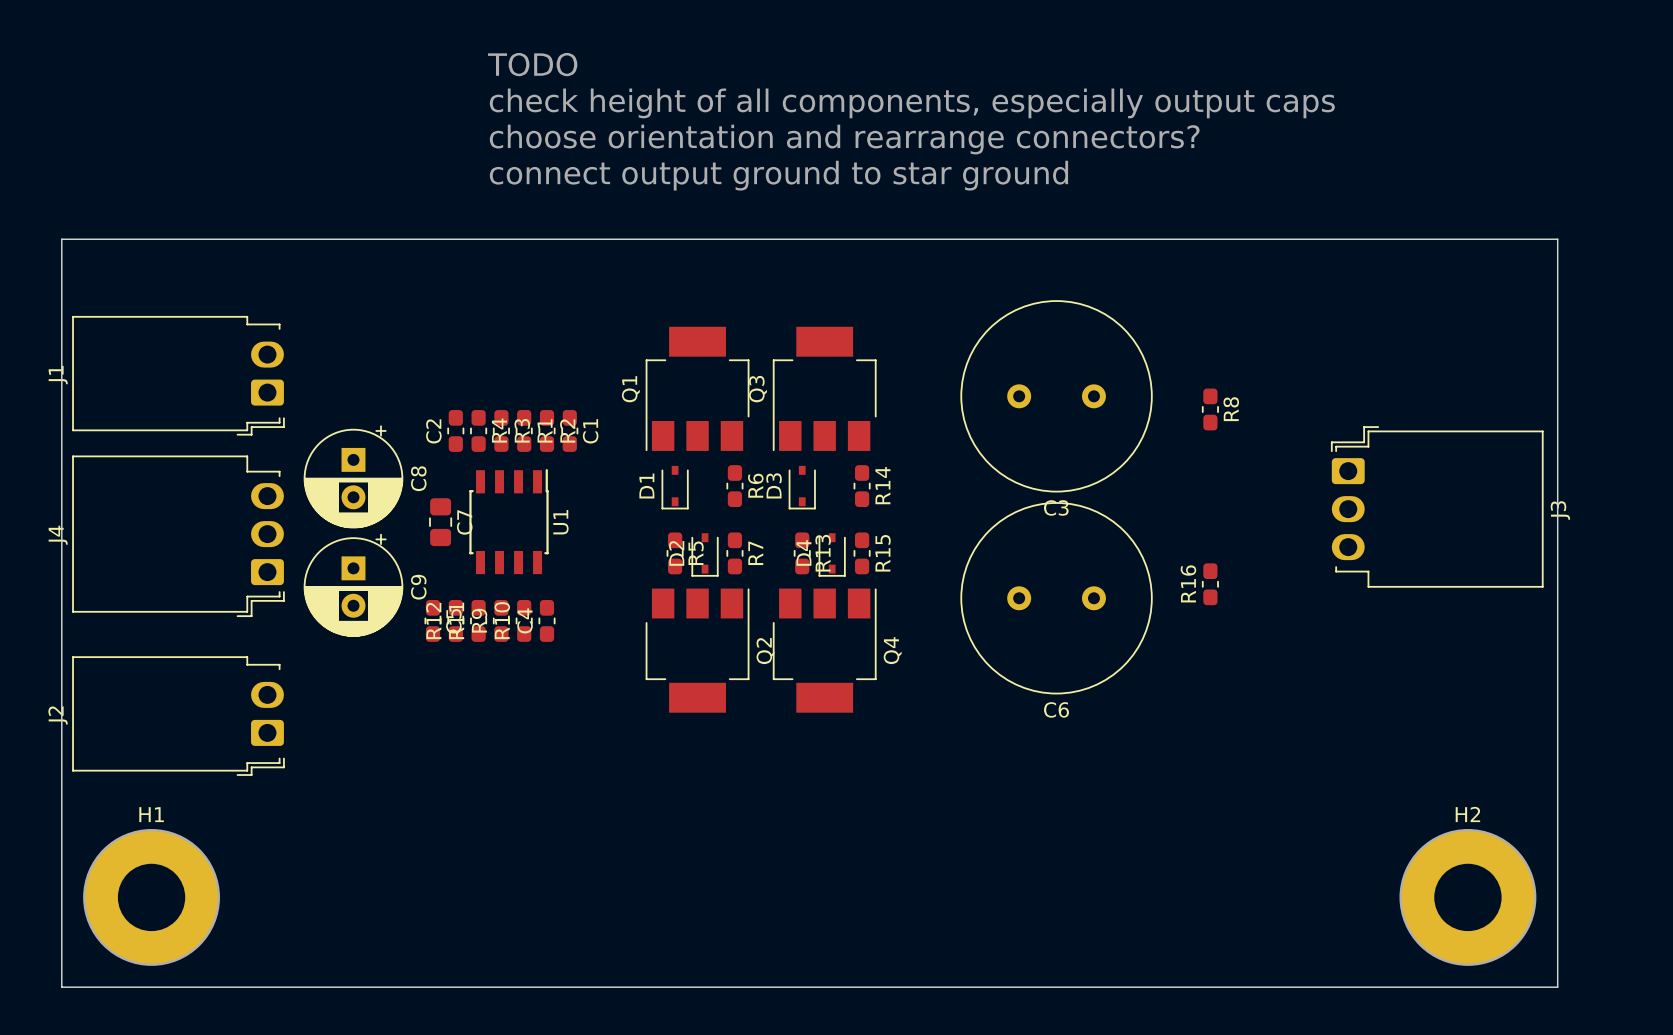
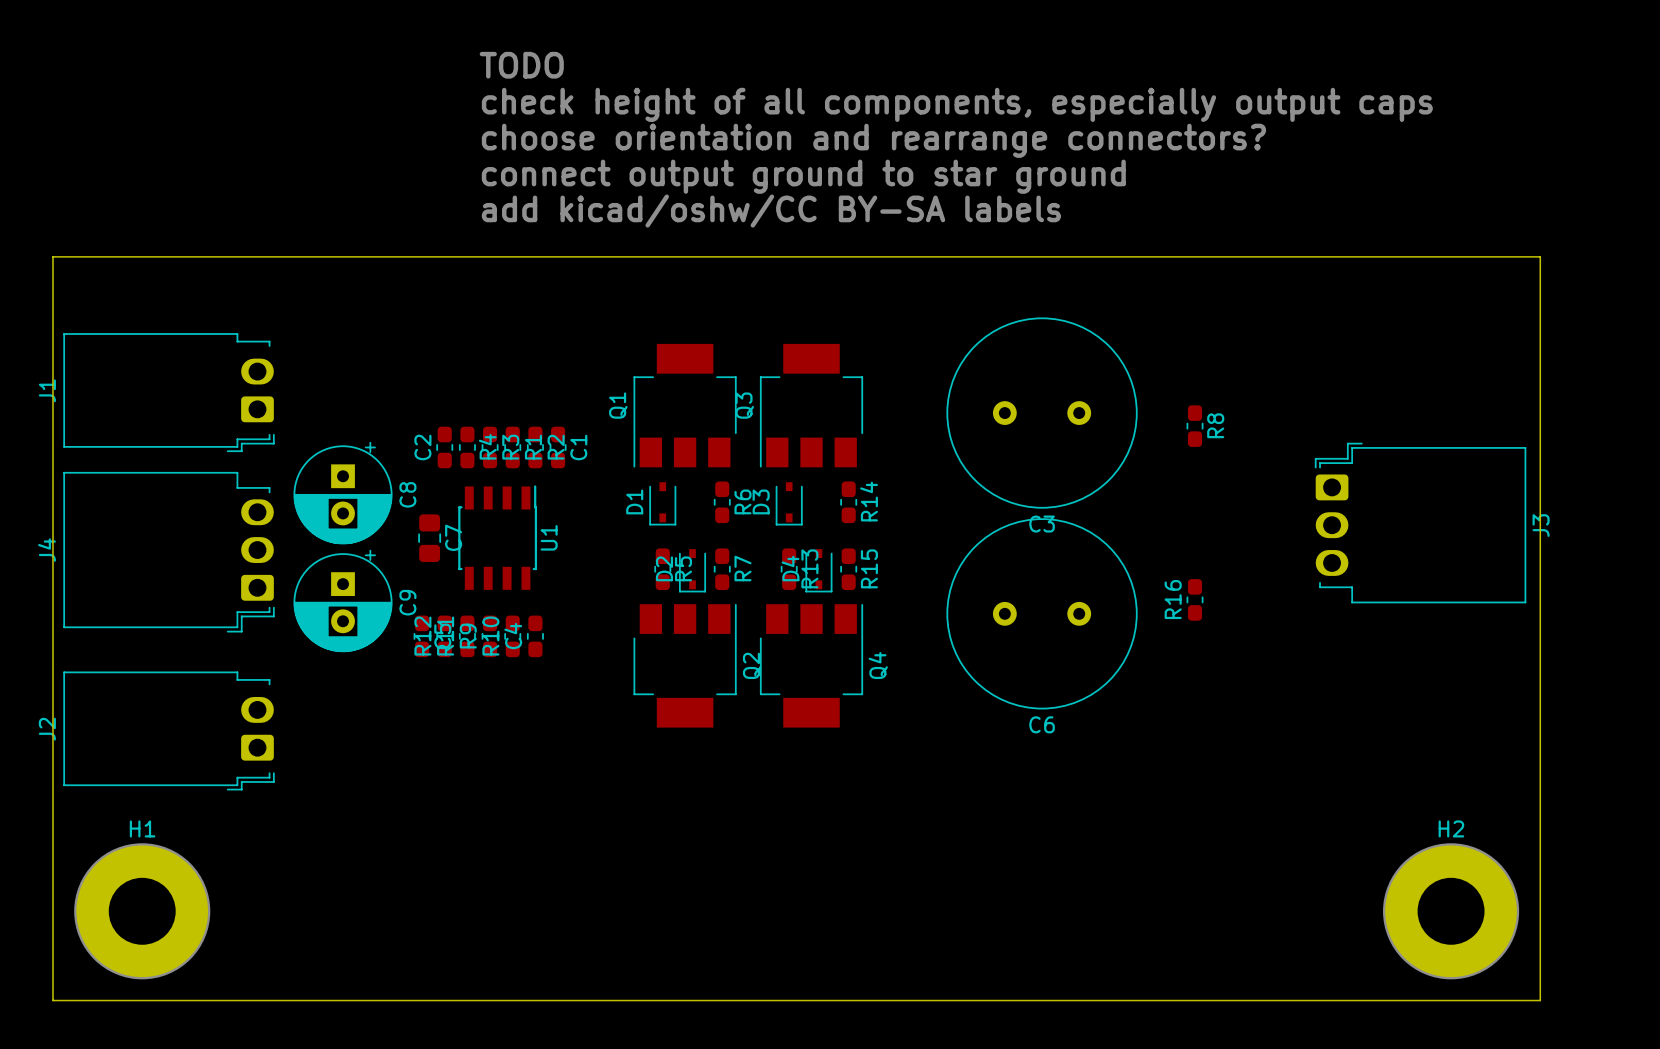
text position: TODO (532, 64) -> TODO (521, 65)
text position: check height of all components, especially output caps (912, 103) -> check height of all components, especially output caps (957, 104)
text position: choose orientation and rearrange connectors? (844, 139) -> choose orientation and rearrange connectors? (873, 140)
text position: connect output ground to star ground (778, 175) -> connect output ground to star ground (803, 176)
text: none -> add kicad/oshw/CC BY-SA labels (771, 211)

